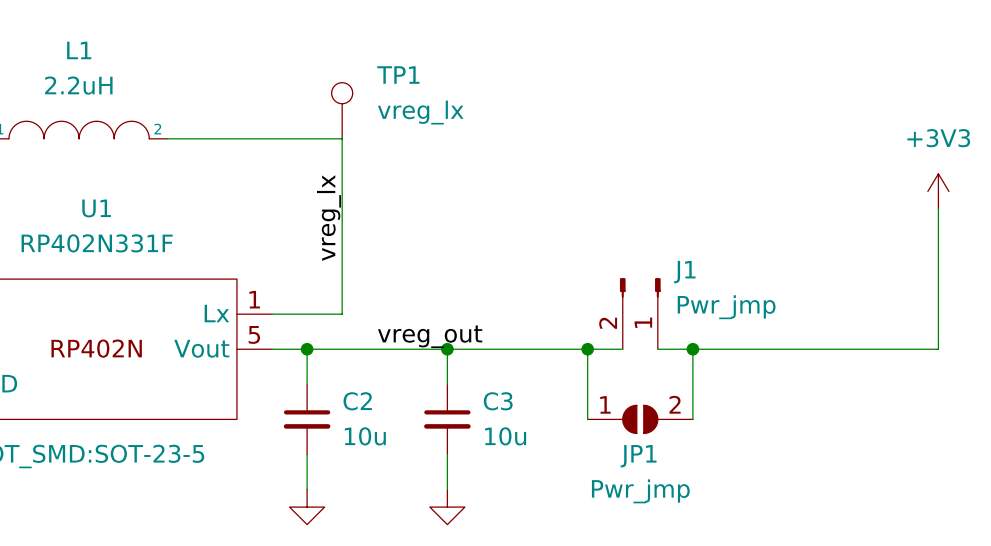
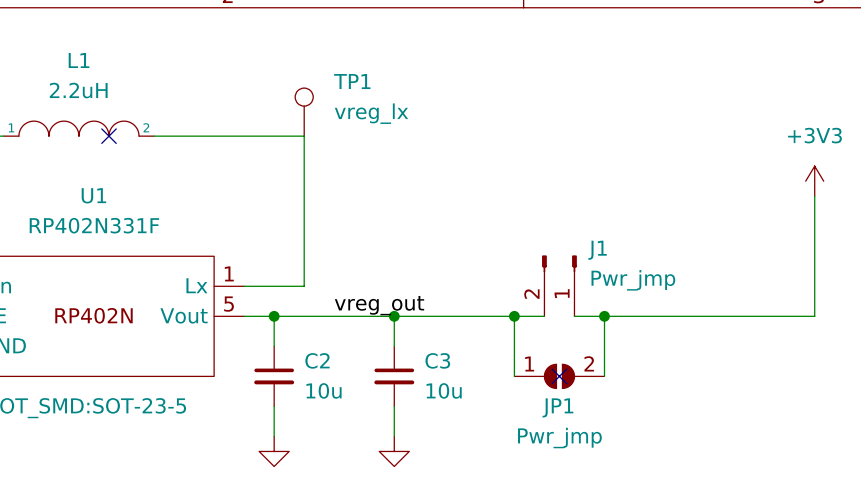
no-connect mark: none -> (109, 136)
label: vreg_lx (328, 218) -> none
no-connect mark: none -> (559, 376)

